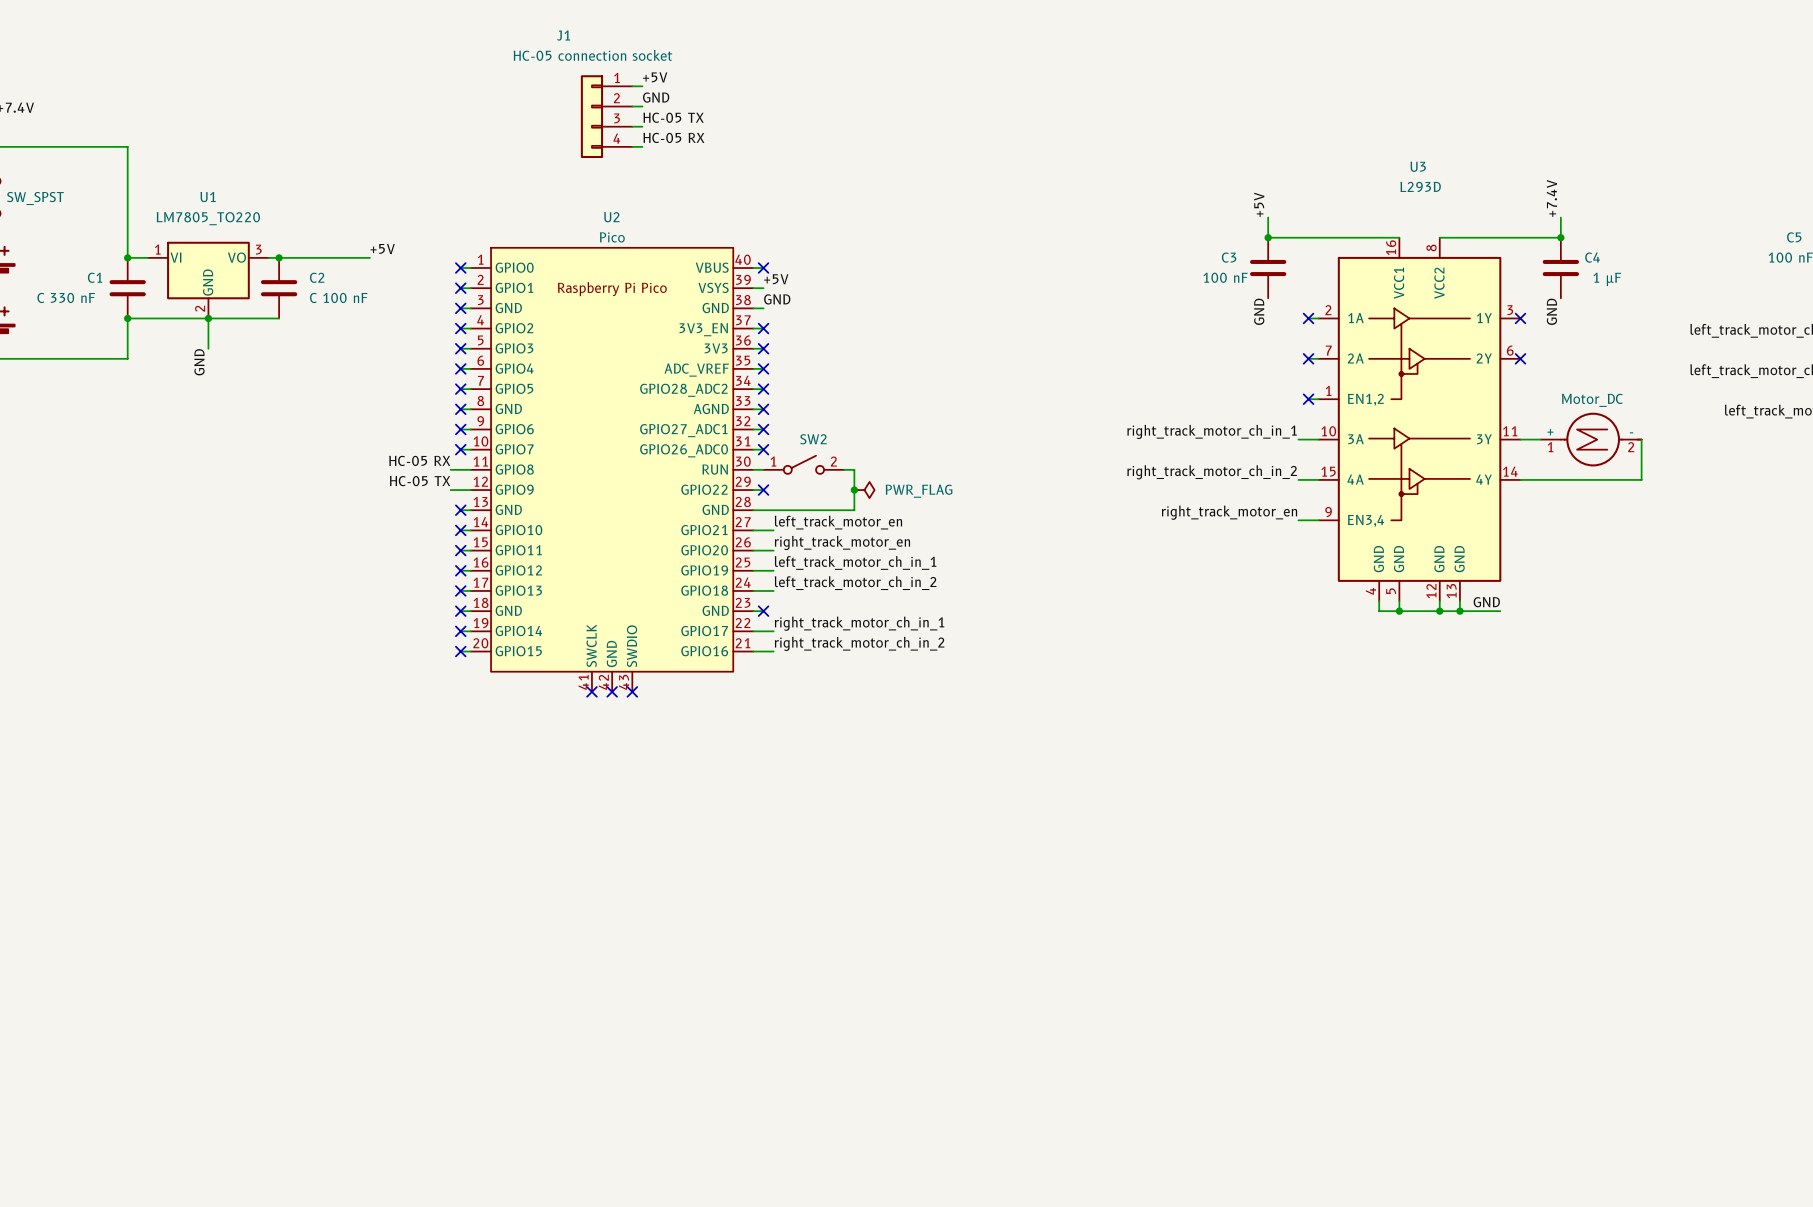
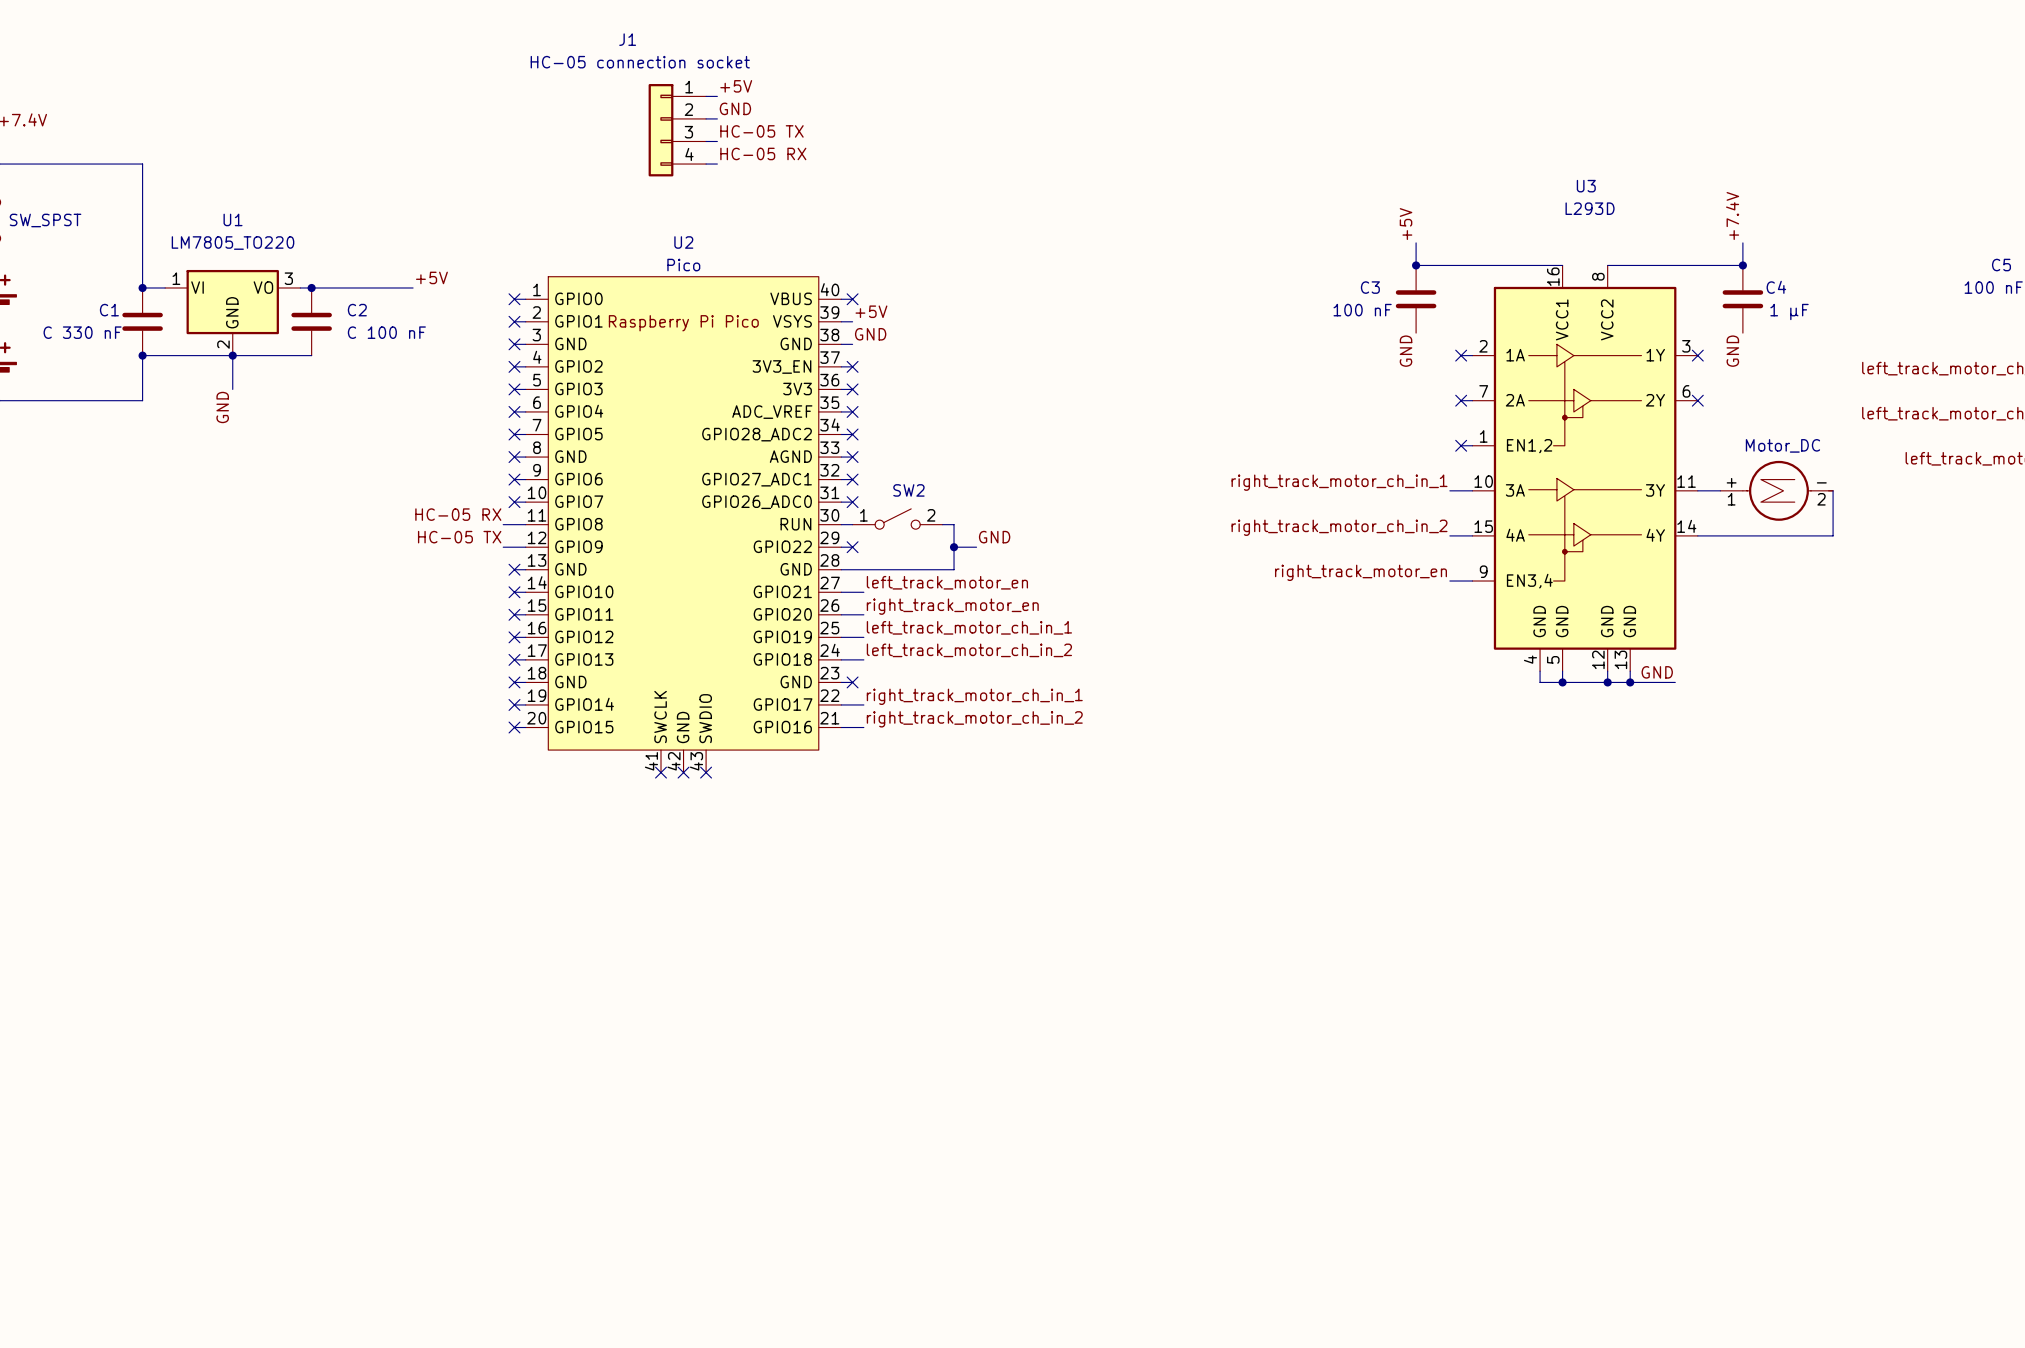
label: none -> GND (994, 537)
power symbol: PWR_FLAG (864, 490) -> none

